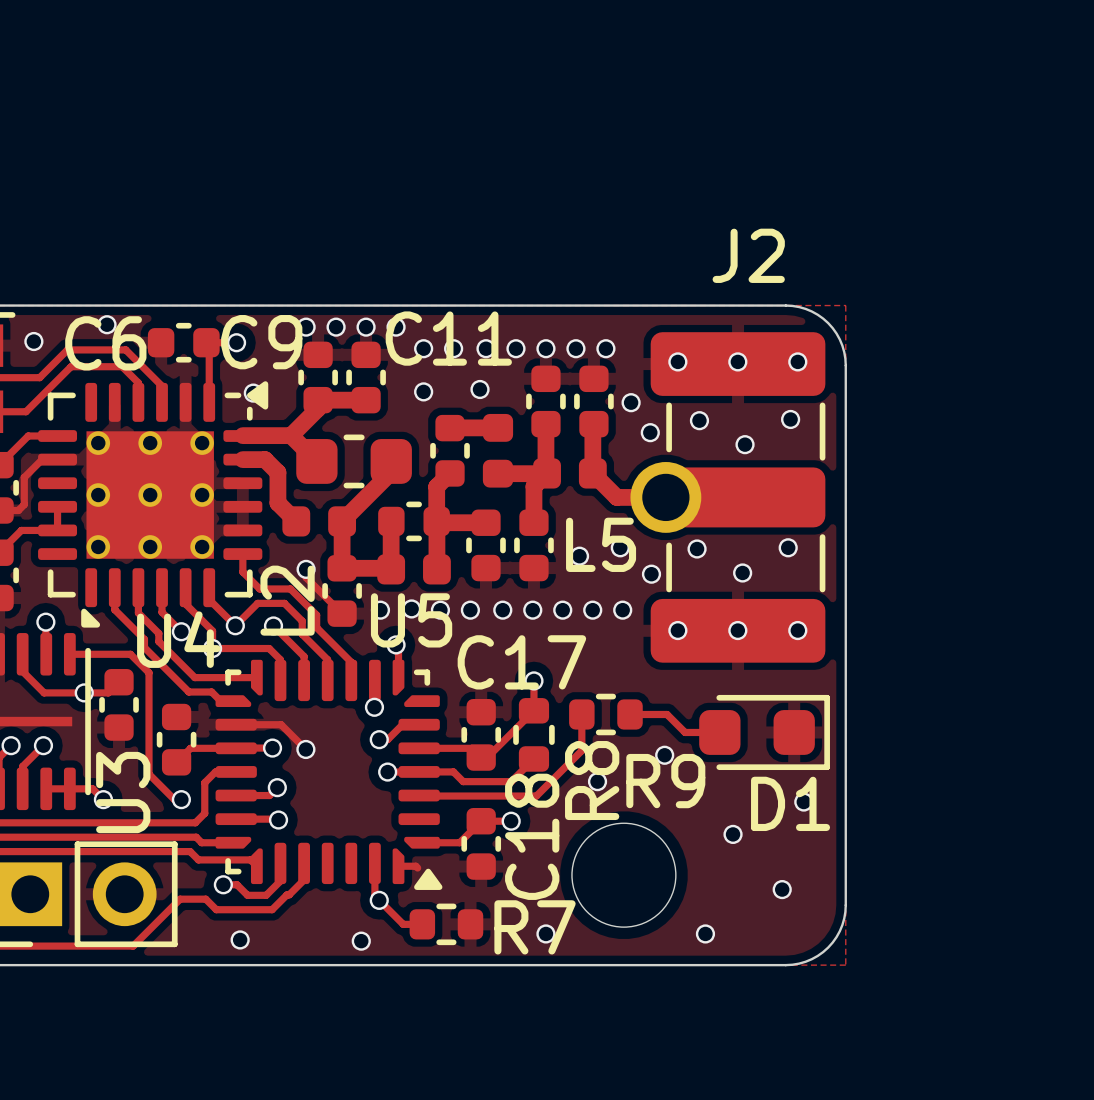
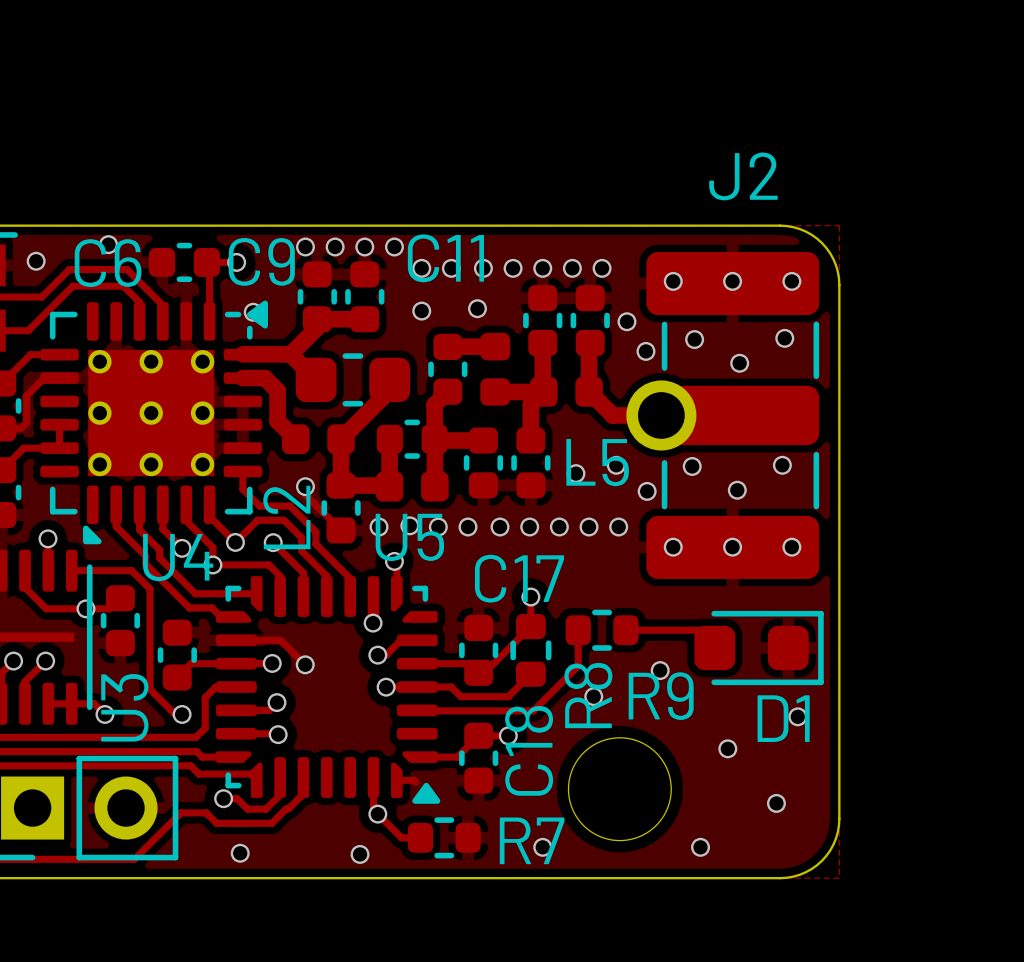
track: (667, 714) (685, 732) (719, 732) -> (662, 630) (696, 630) (714, 648)

